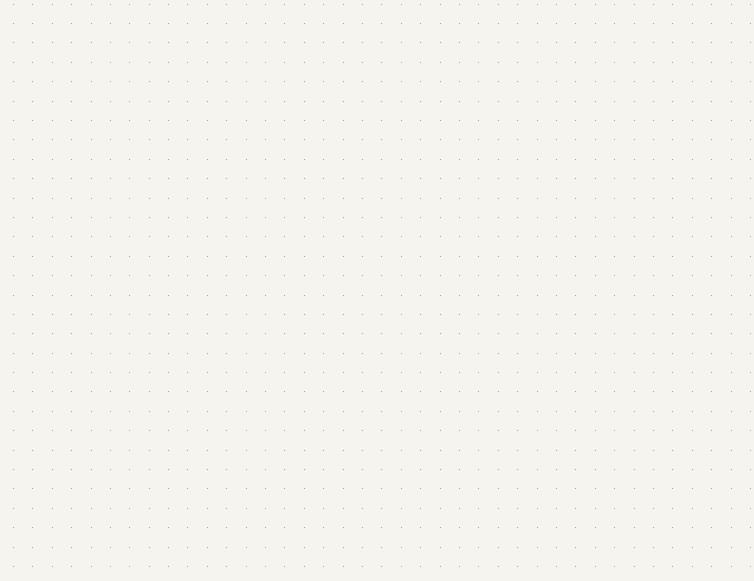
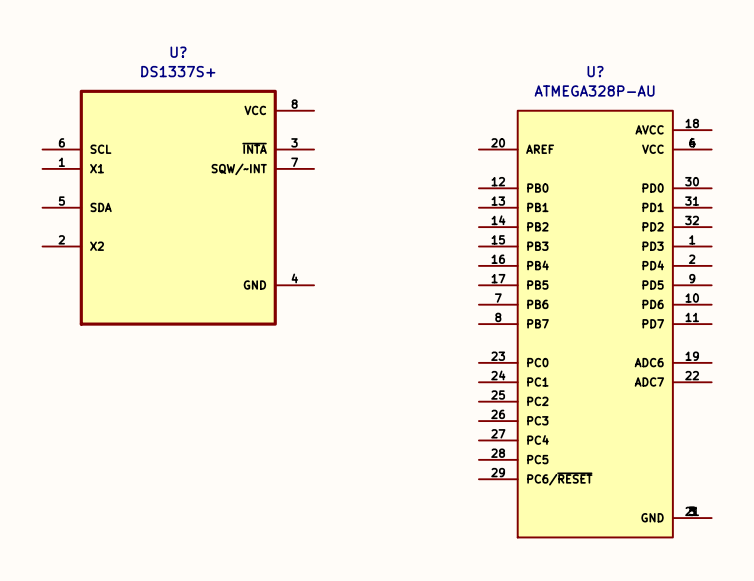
U?: none -> DS1337S+ (178, 207)
U?: none -> ATMEGA328P-AU (595, 324)

